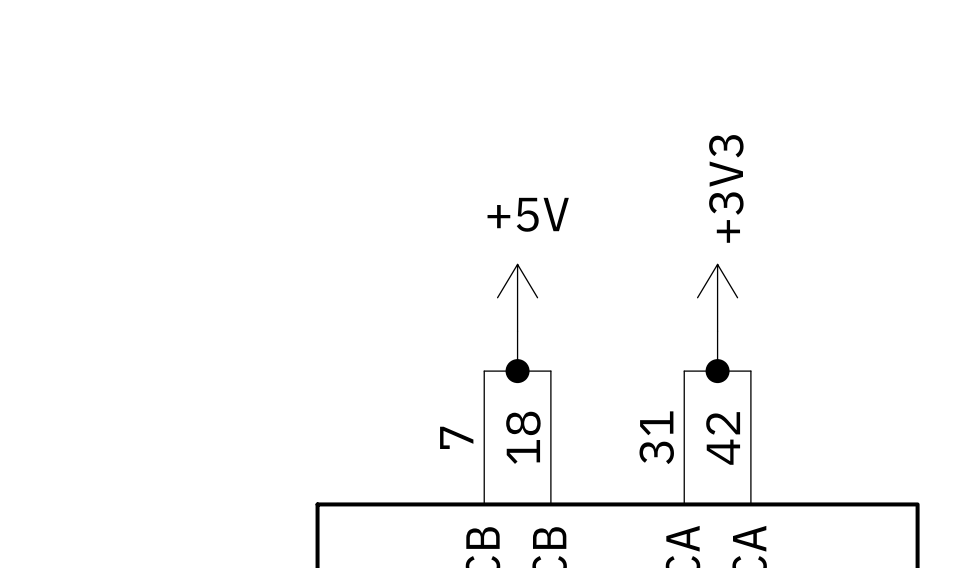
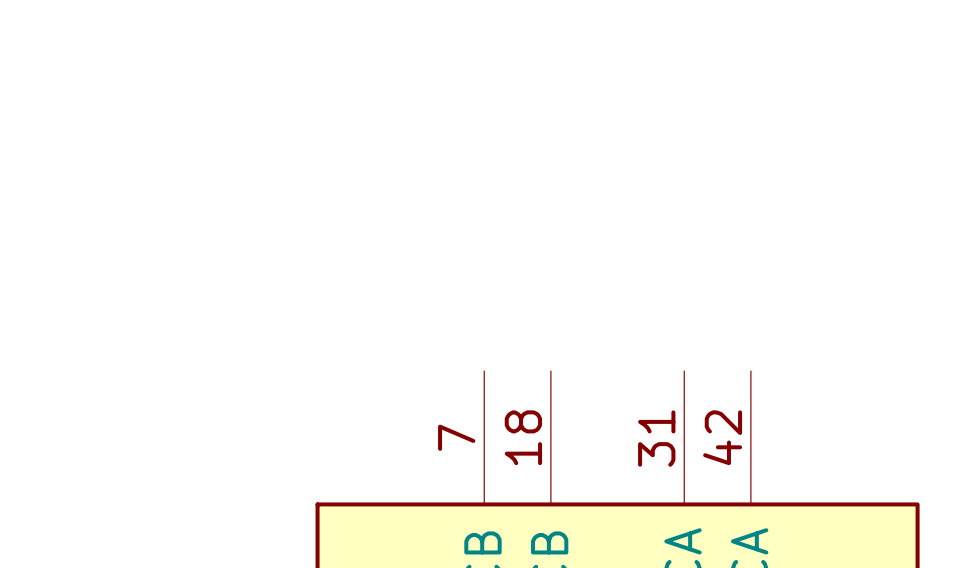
power symbol: +5V (517, 297) -> none
power symbol: +3V3 (717, 297) -> none
wire: (517, 331) (517, 371) -> none
wire: (717, 331) (717, 371) -> none
wire: (484, 371) (550, 371) -> none
junction: (517, 371) -> none
wire: (684, 371) (750, 371) -> none
junction: (717, 371) -> none

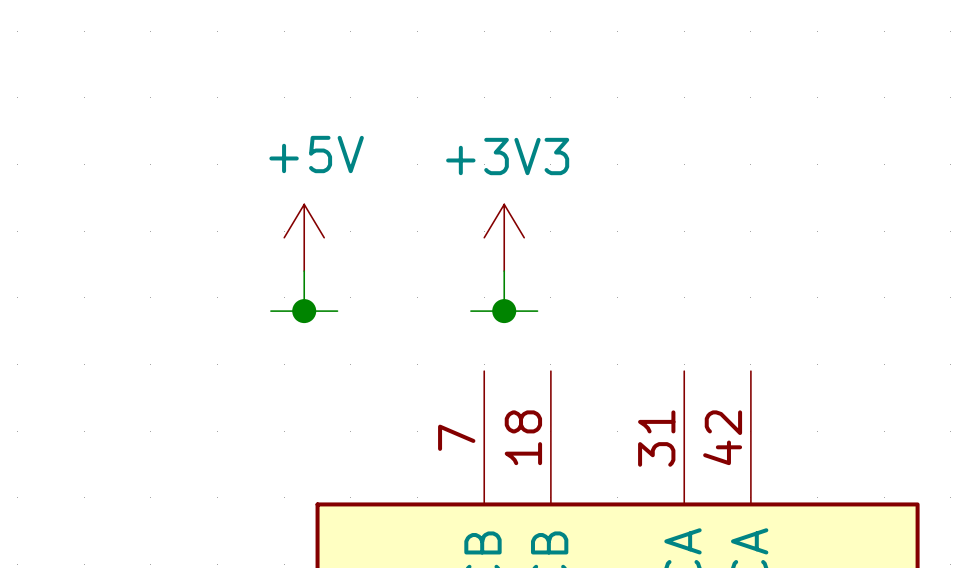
power symbol: none -> +5V (304, 237)
power symbol: none -> +3V3 (504, 237)
wire: none -> (304, 271) (304, 311)
wire: none -> (504, 271) (504, 311)
wire: none -> (270, 311) (337, 311)
junction: none -> (304, 311)
wire: none -> (470, 311) (537, 311)
junction: none -> (504, 311)

